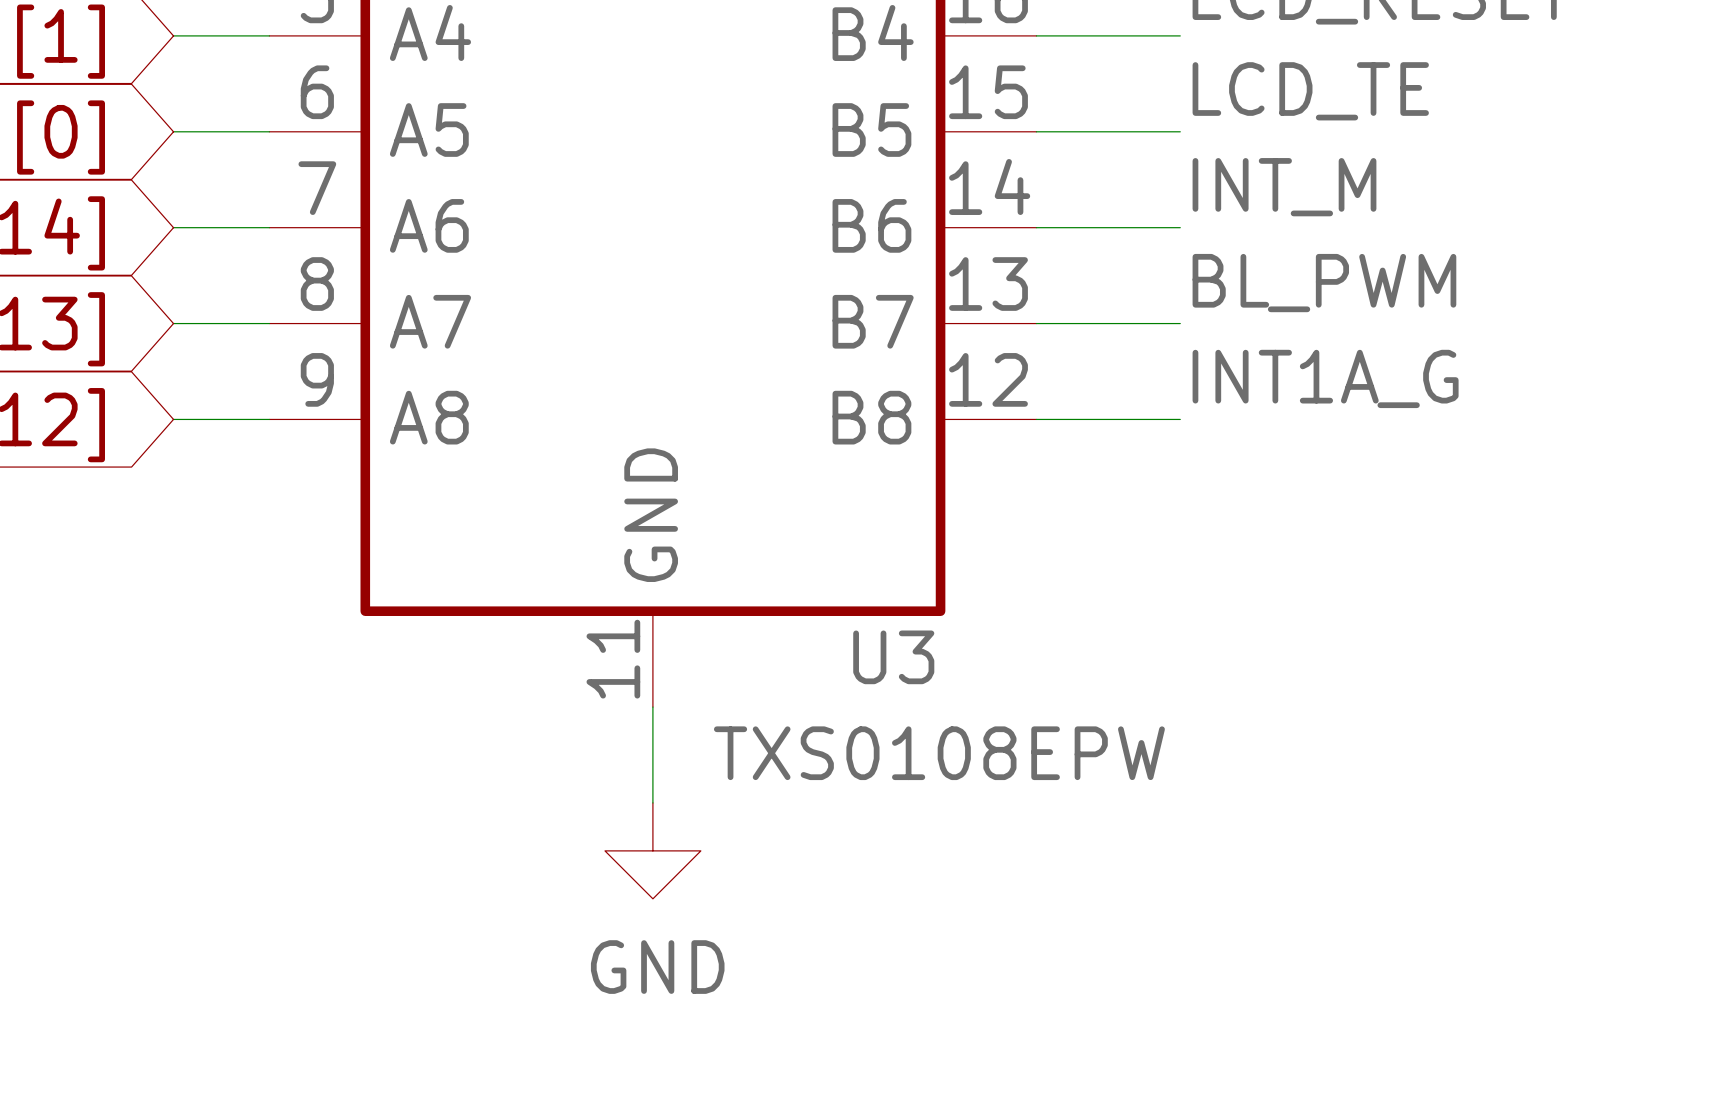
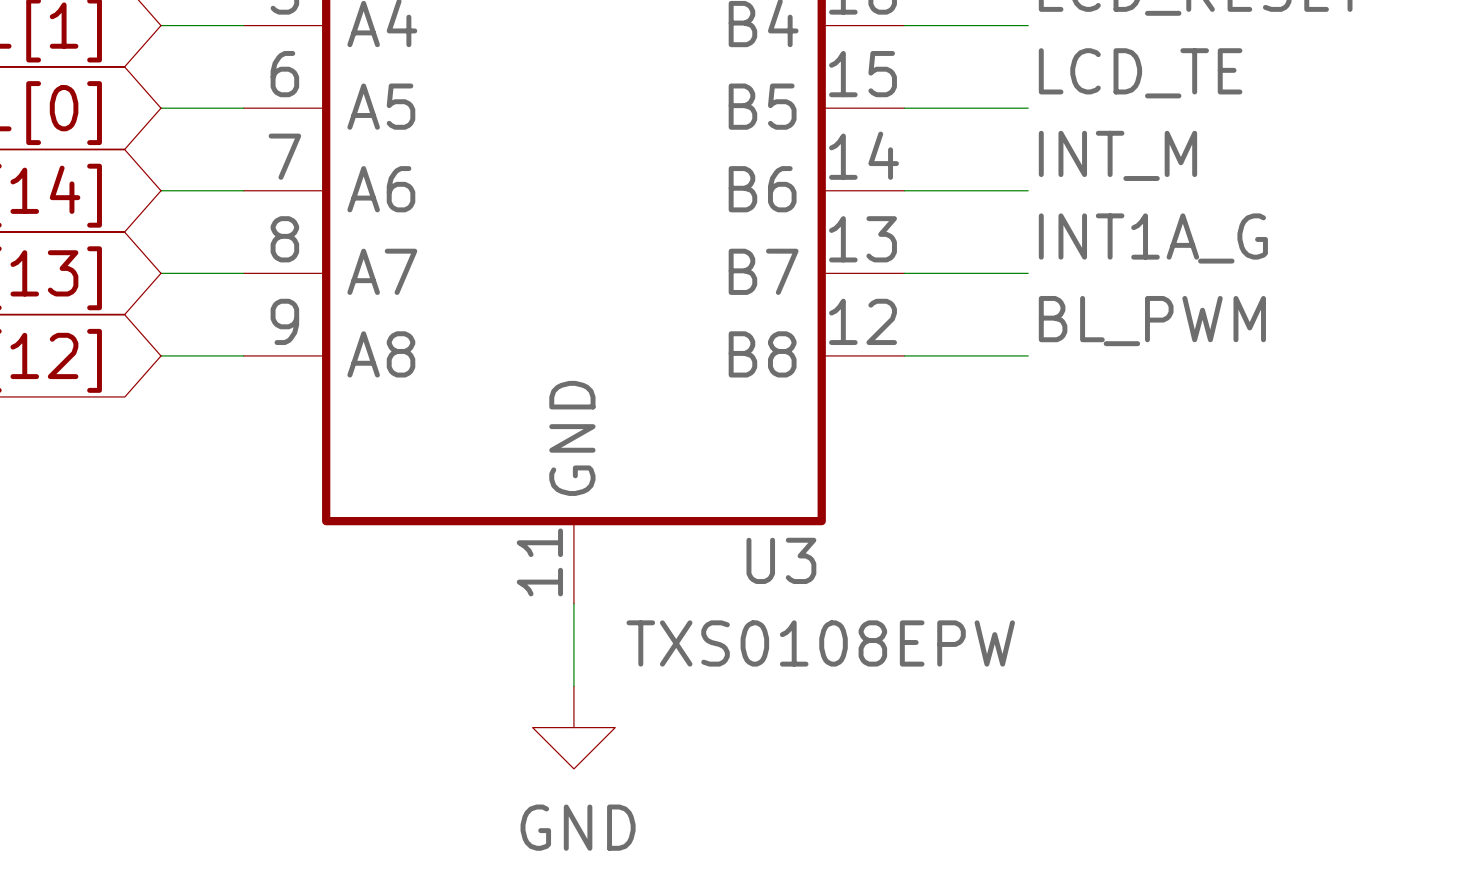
label: BL_PWM (1324, 283) -> INT1A_G (1153, 238)
label: INT1A_G (1325, 378) -> BL_PWM (1152, 321)

